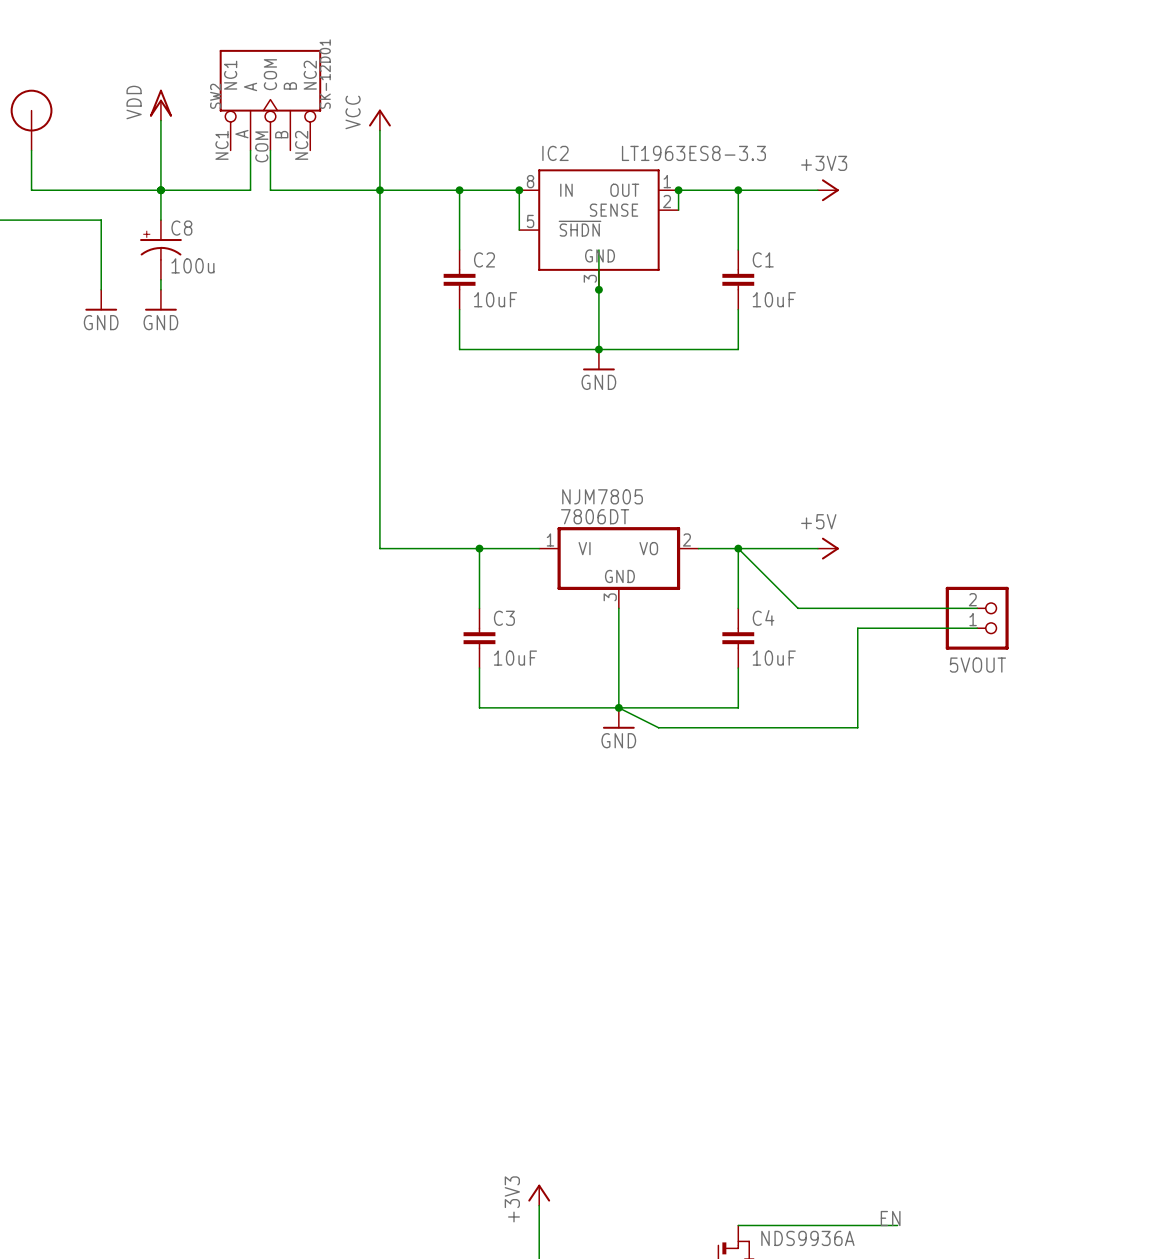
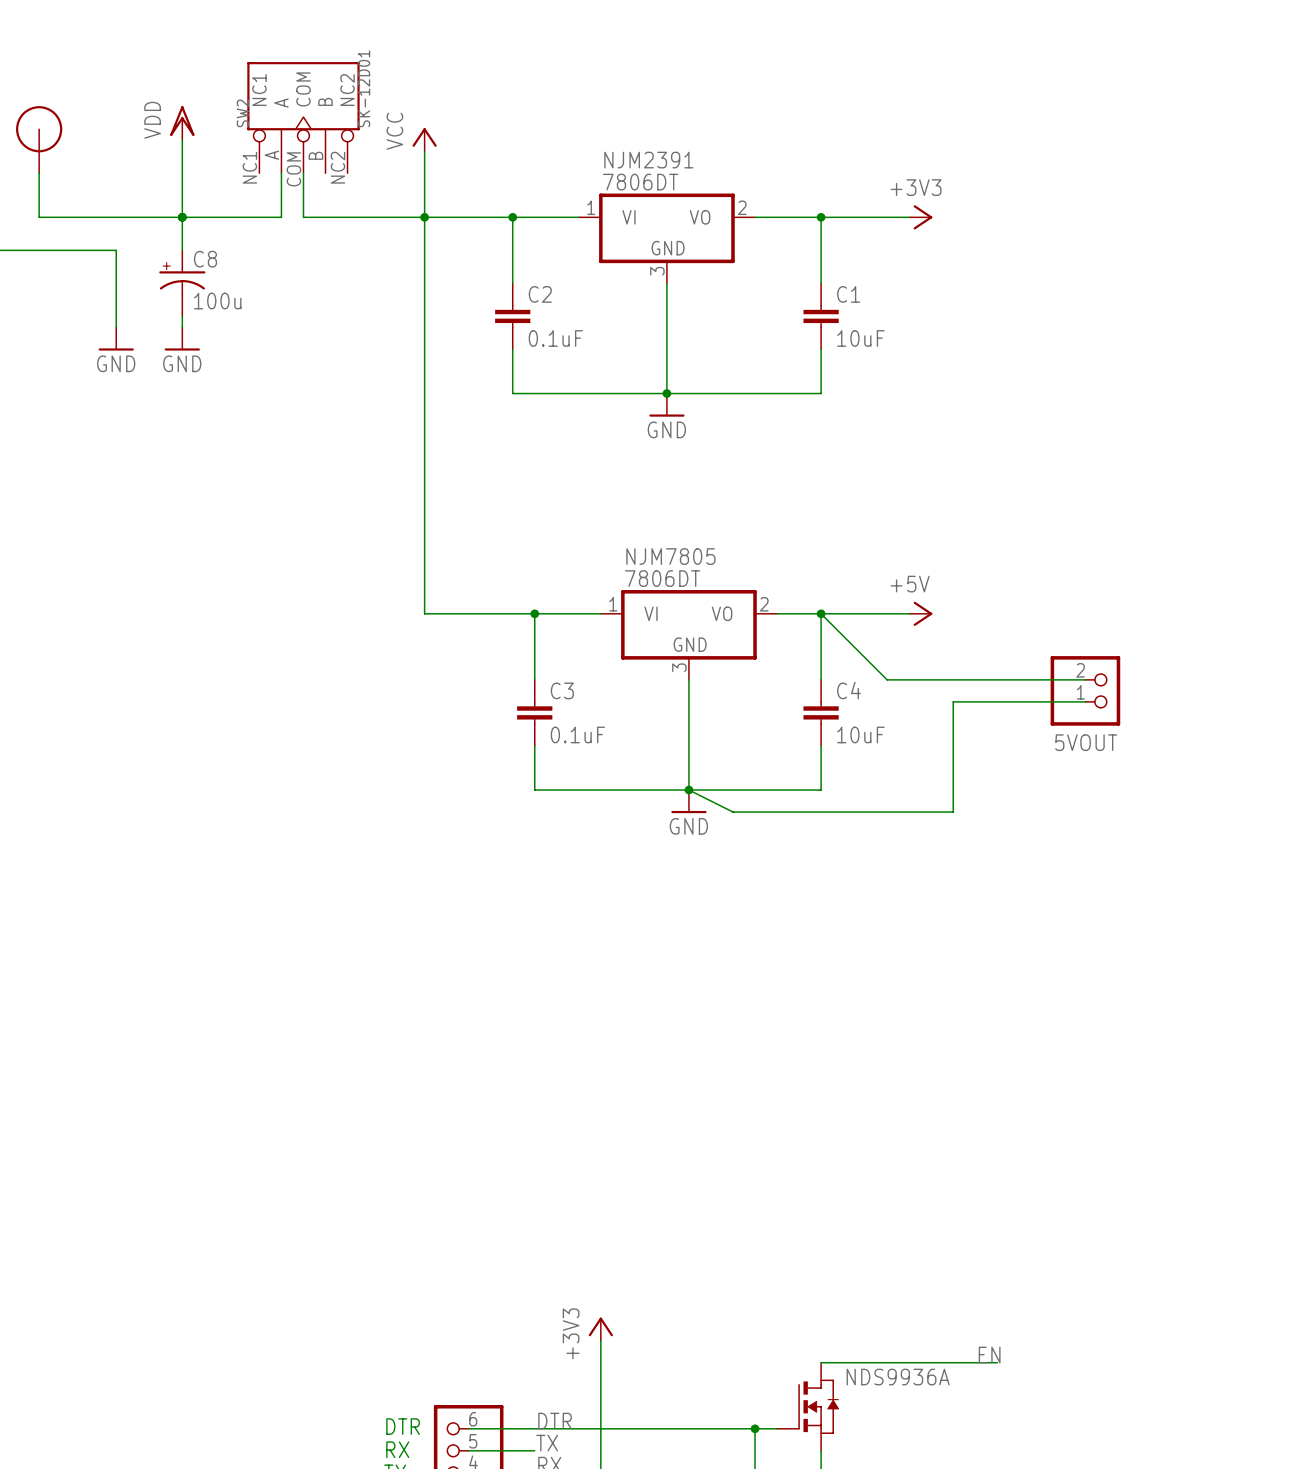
wire: (519, 190) (519, 230) -> none
junction: (519, 190) -> none
wire: (678, 190) (678, 210) -> none
junction: (678, 190) -> none
NJM2391: none -> 7806DT (666, 238)
IC2: LT1963ES8-3.3 (598, 229) -> none
junction: (598, 289) -> none
C2 value: 10uF (495, 299) -> 0.1uF (555, 338)
C3 value: 10uF (515, 658) -> 0.1uF (577, 734)

